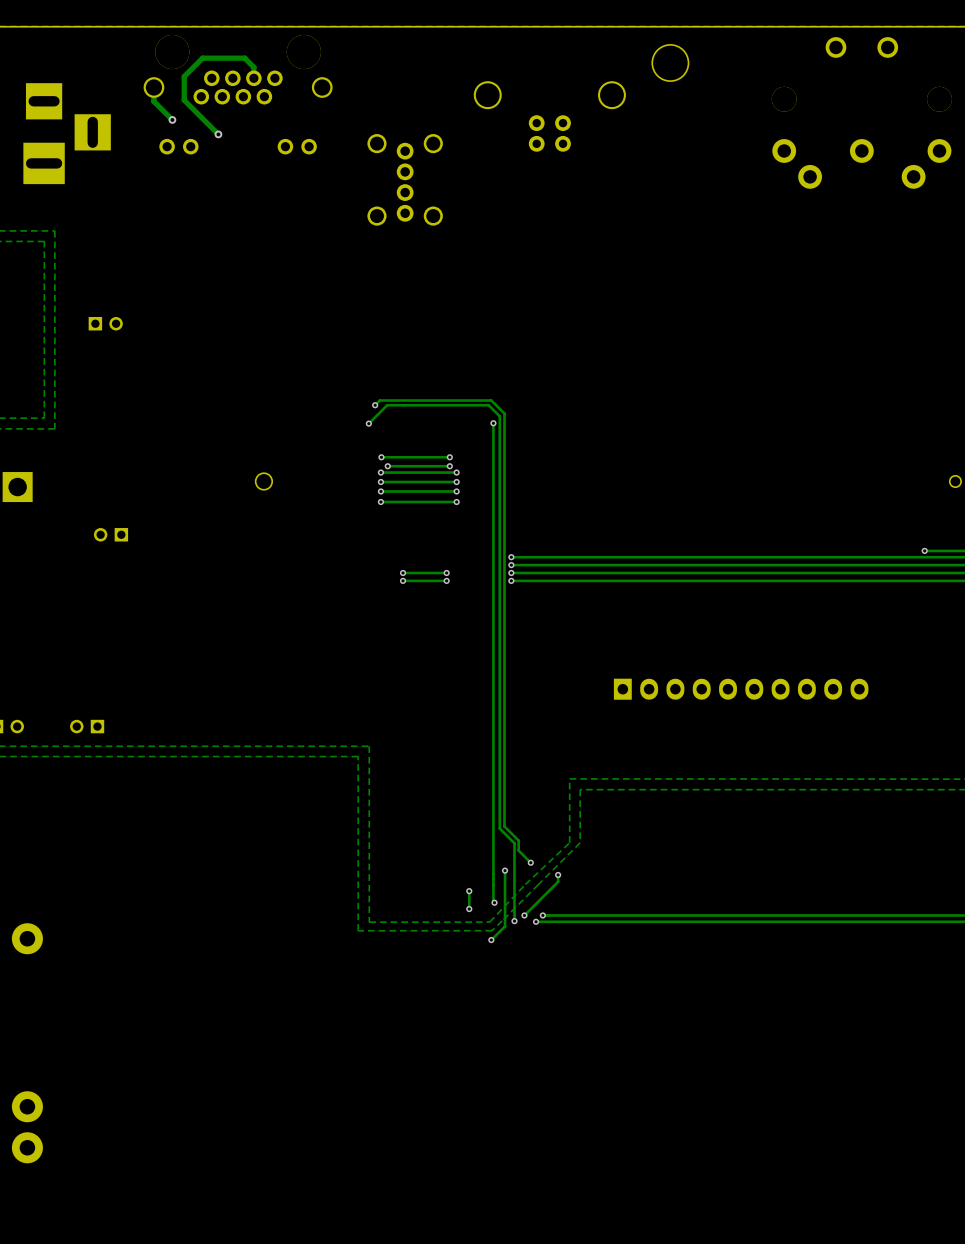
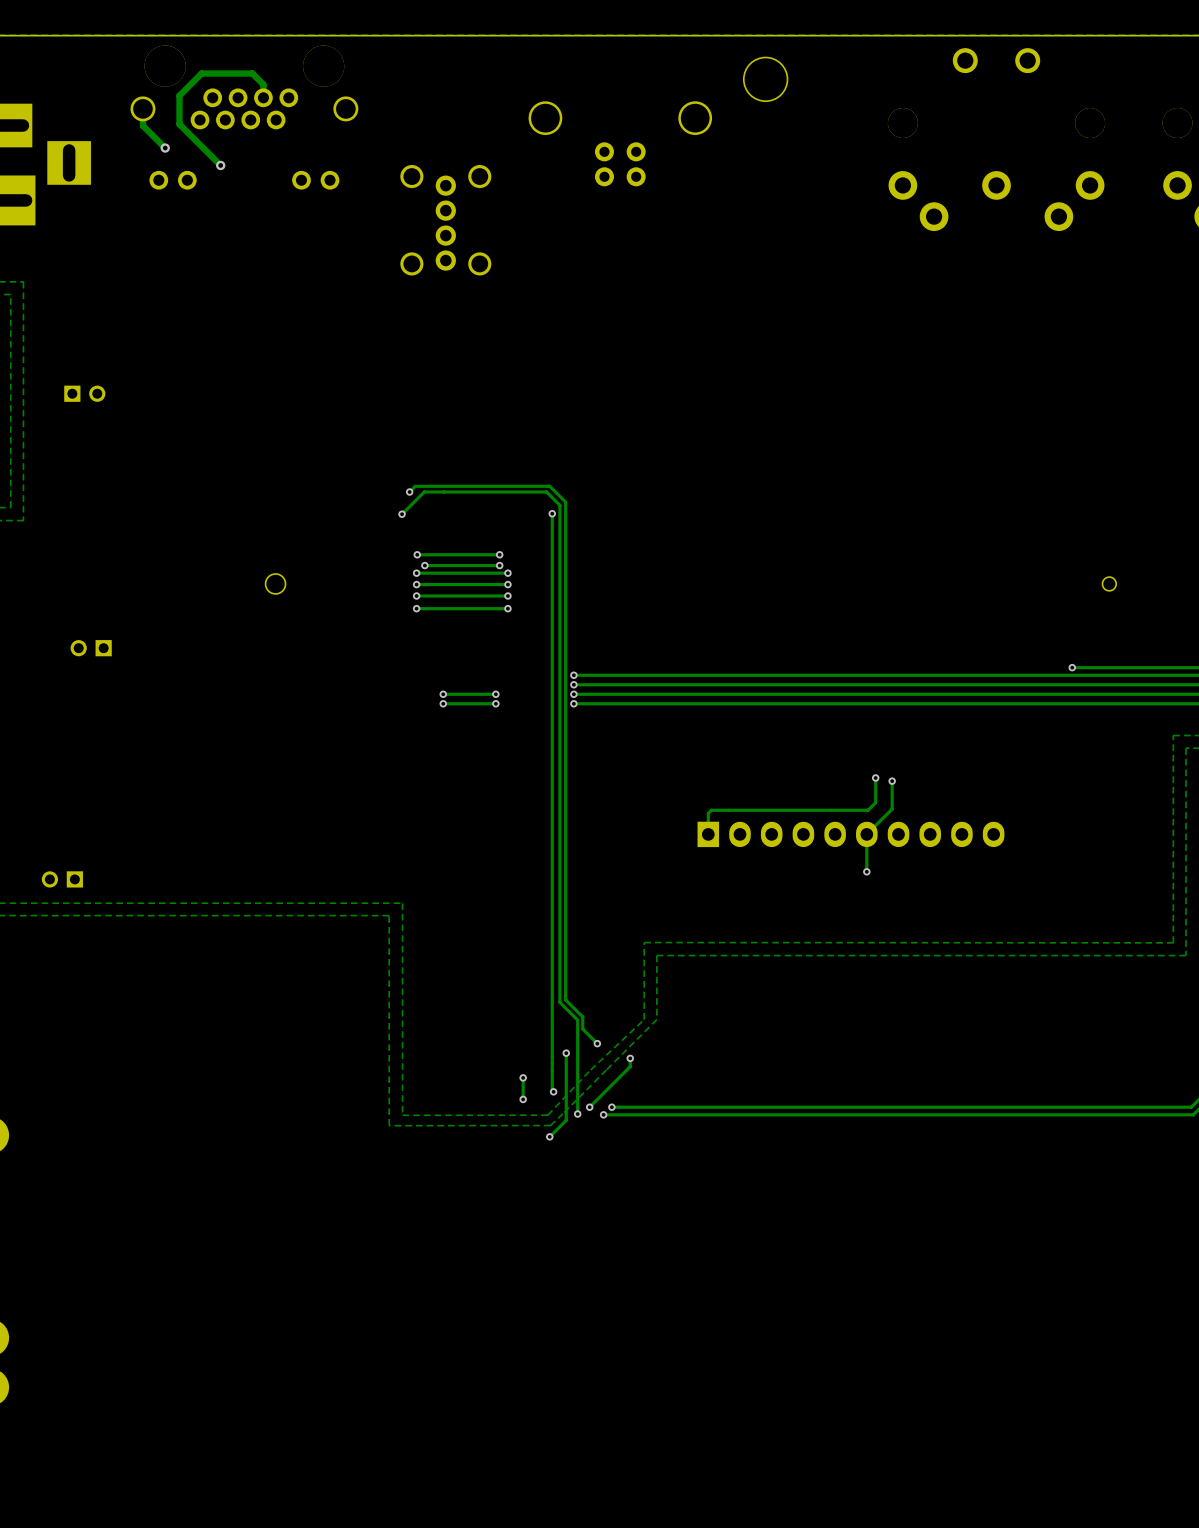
track: none -> (875, 777) (875, 802) (868, 810) (711, 810) (708, 813) (708, 834)
via: none -> (875, 777)
track: none -> (892, 781) (892, 809) (866, 834) (866, 871)
via: none -> (892, 781)
via: none -> (866, 871)

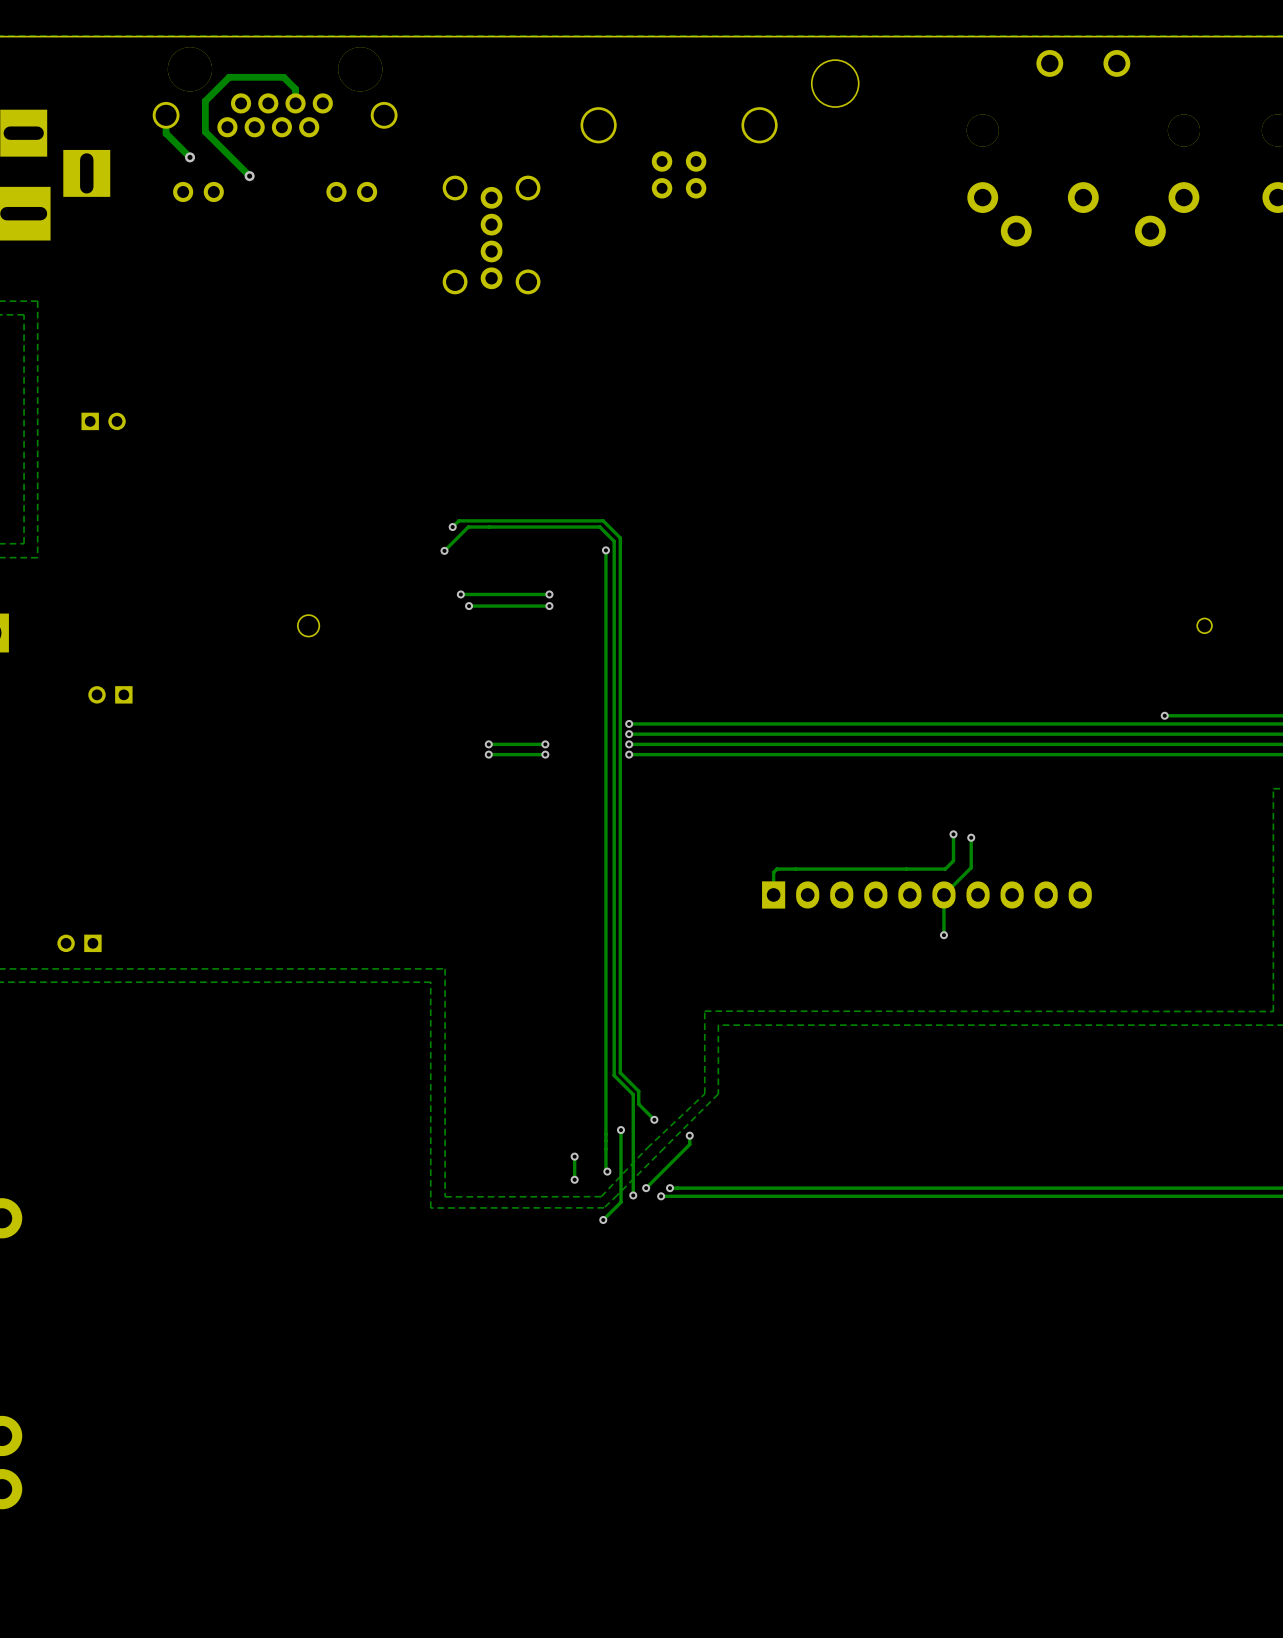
via: (416, 573) -> none
track: (507, 573) (416, 573) -> none
via: (507, 573) -> none
via: (416, 584) -> none
track: (507, 584) (416, 584) -> none
via: (507, 584) -> none
via: (416, 595) -> none
track: (507, 595) (416, 595) -> none
via: (507, 595) -> none
via: (416, 608) -> none
track: (507, 608) (416, 608) -> none
via: (507, 608) -> none

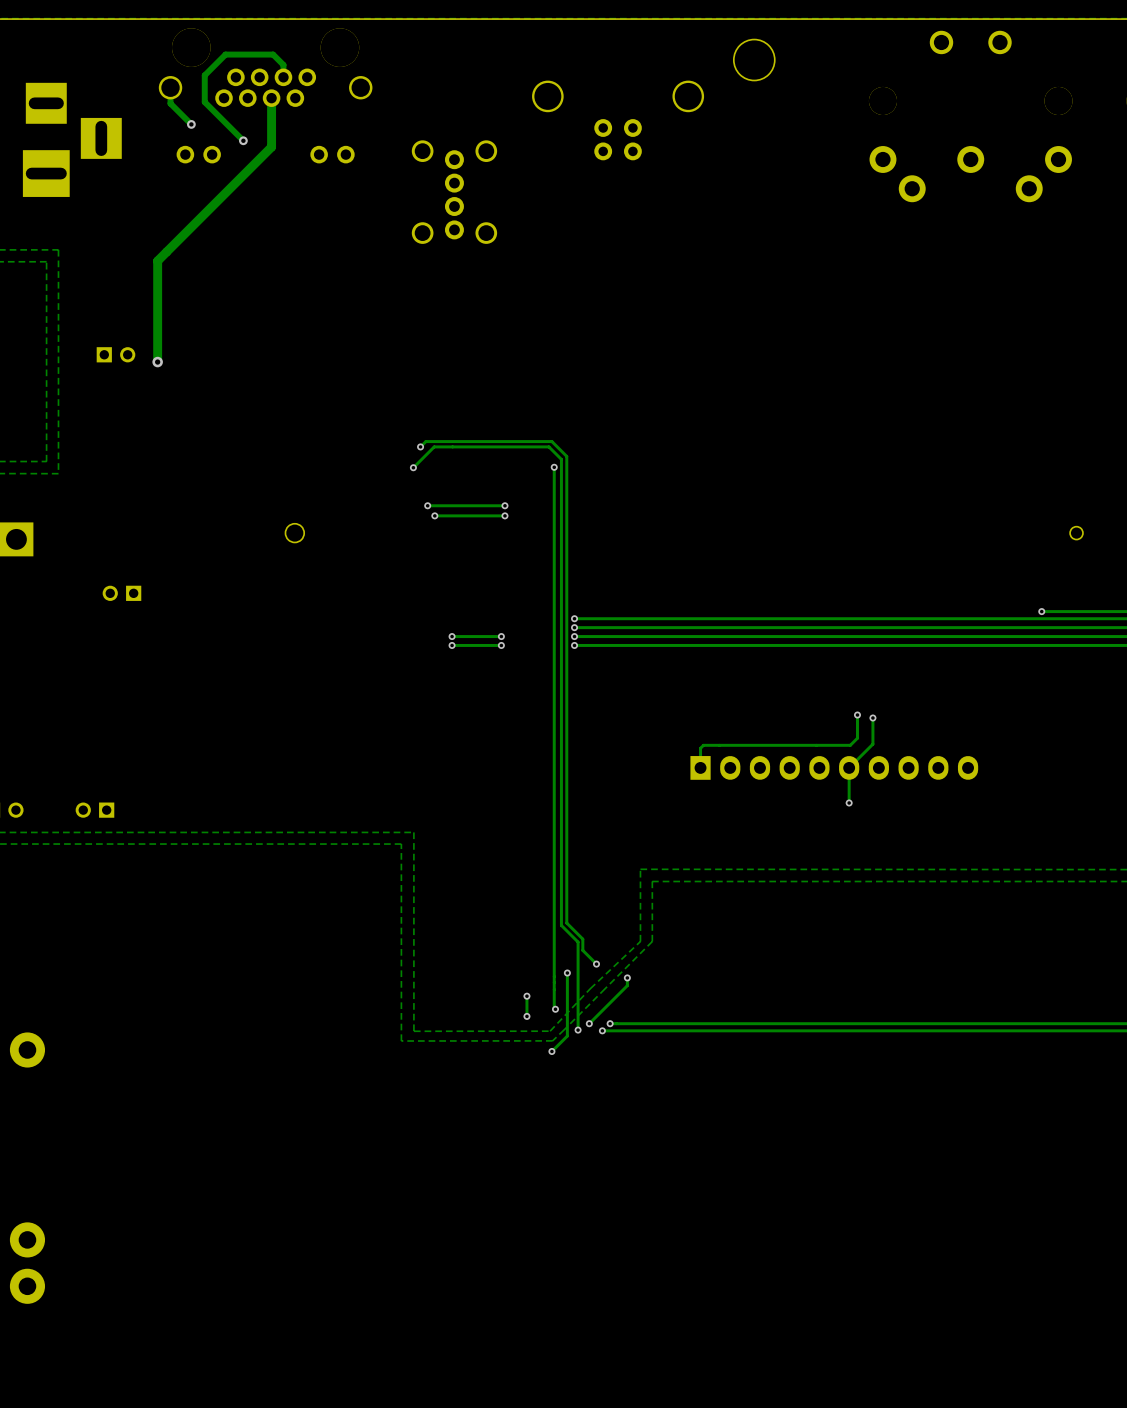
track: none -> (271, 98) (271, 147) (157, 260) (157, 362)
via: none -> (157, 362)

